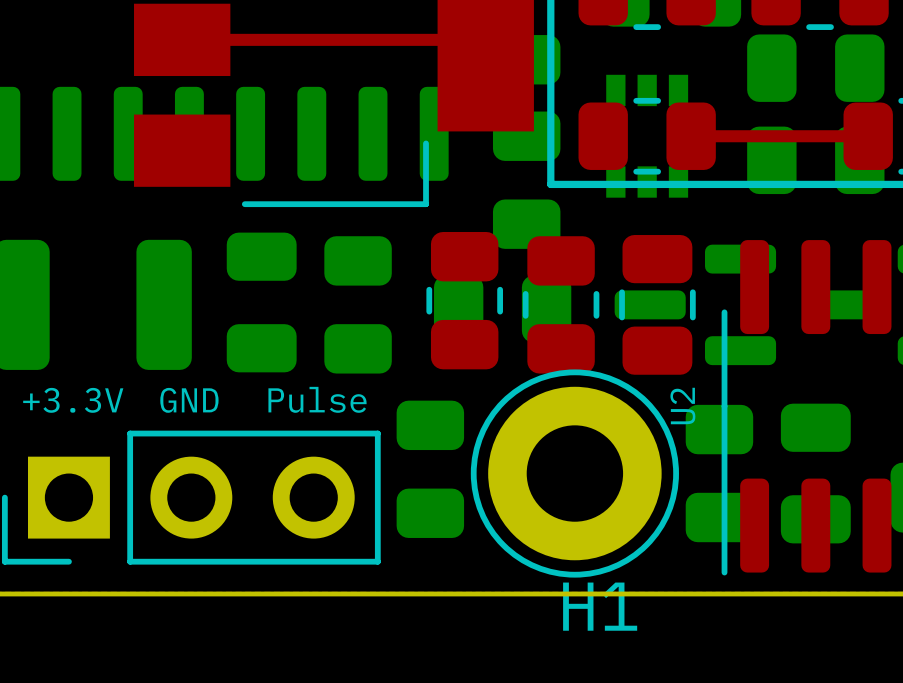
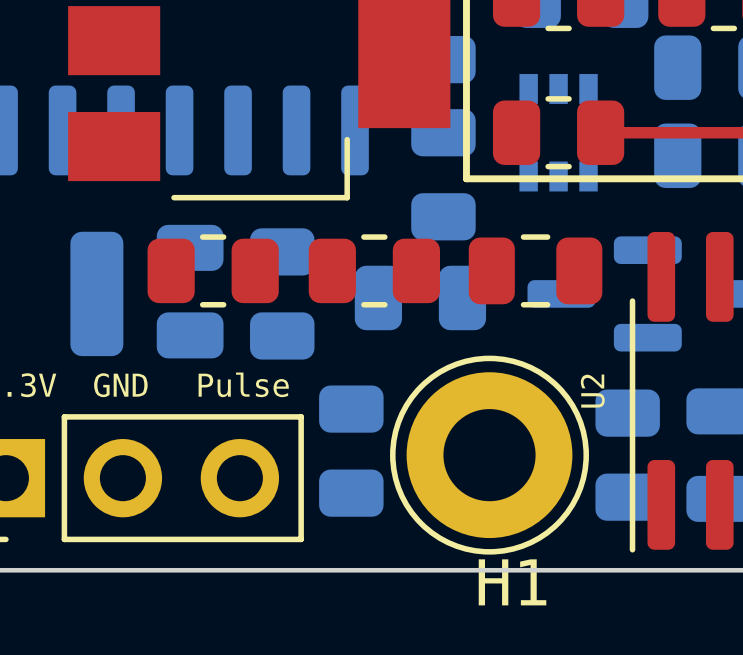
top track: (182, 39) (485, 39) -> none
part rotation: 0° (464, 300) -> 90° clockwise (374, 270)
part rotation: 0° (561, 304) -> 90° clockwise (213, 270)
part position: (561, 304) -> (213, 270)
part rotation: 0° (657, 304) -> 90° clockwise (535, 270)

